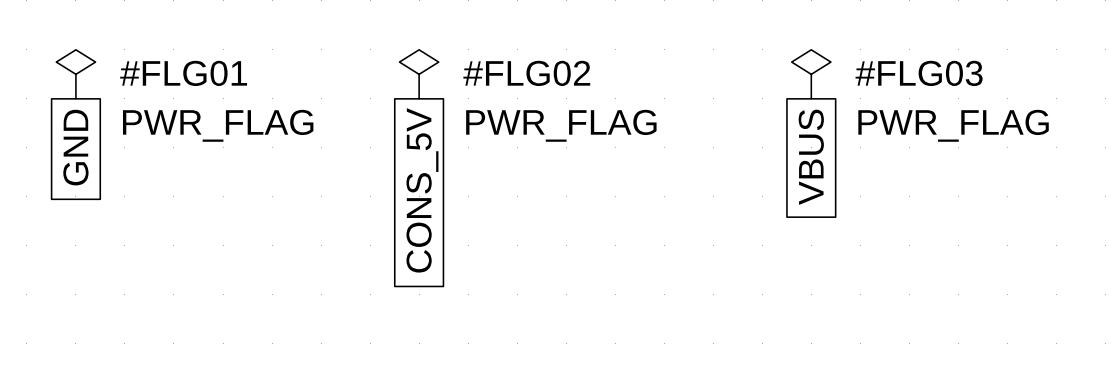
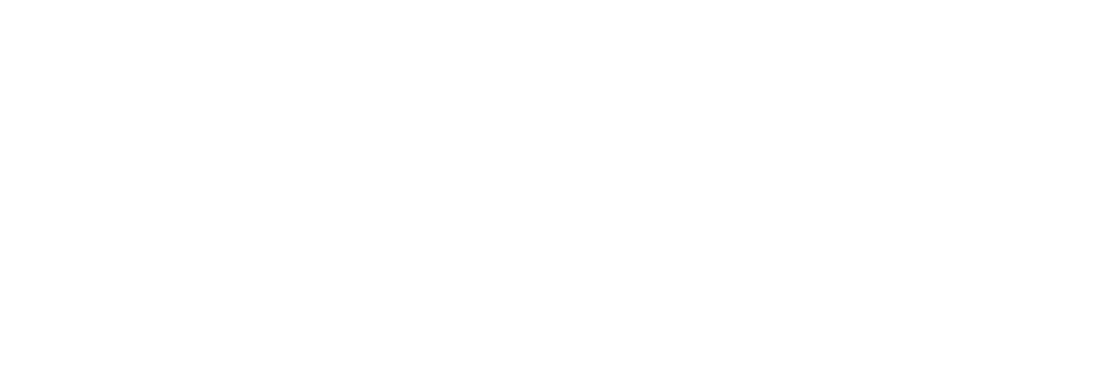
#FLG01: PWR_FLAG (75, 74) -> none
#FLG02: PWR_FLAG (419, 74) -> none
#FLG03: PWR_FLAG (811, 74) -> none
global label: GND (75, 147) -> none
global label: VBUS (811, 157) -> none
global label: CONS_5V (422, 190) -> none

